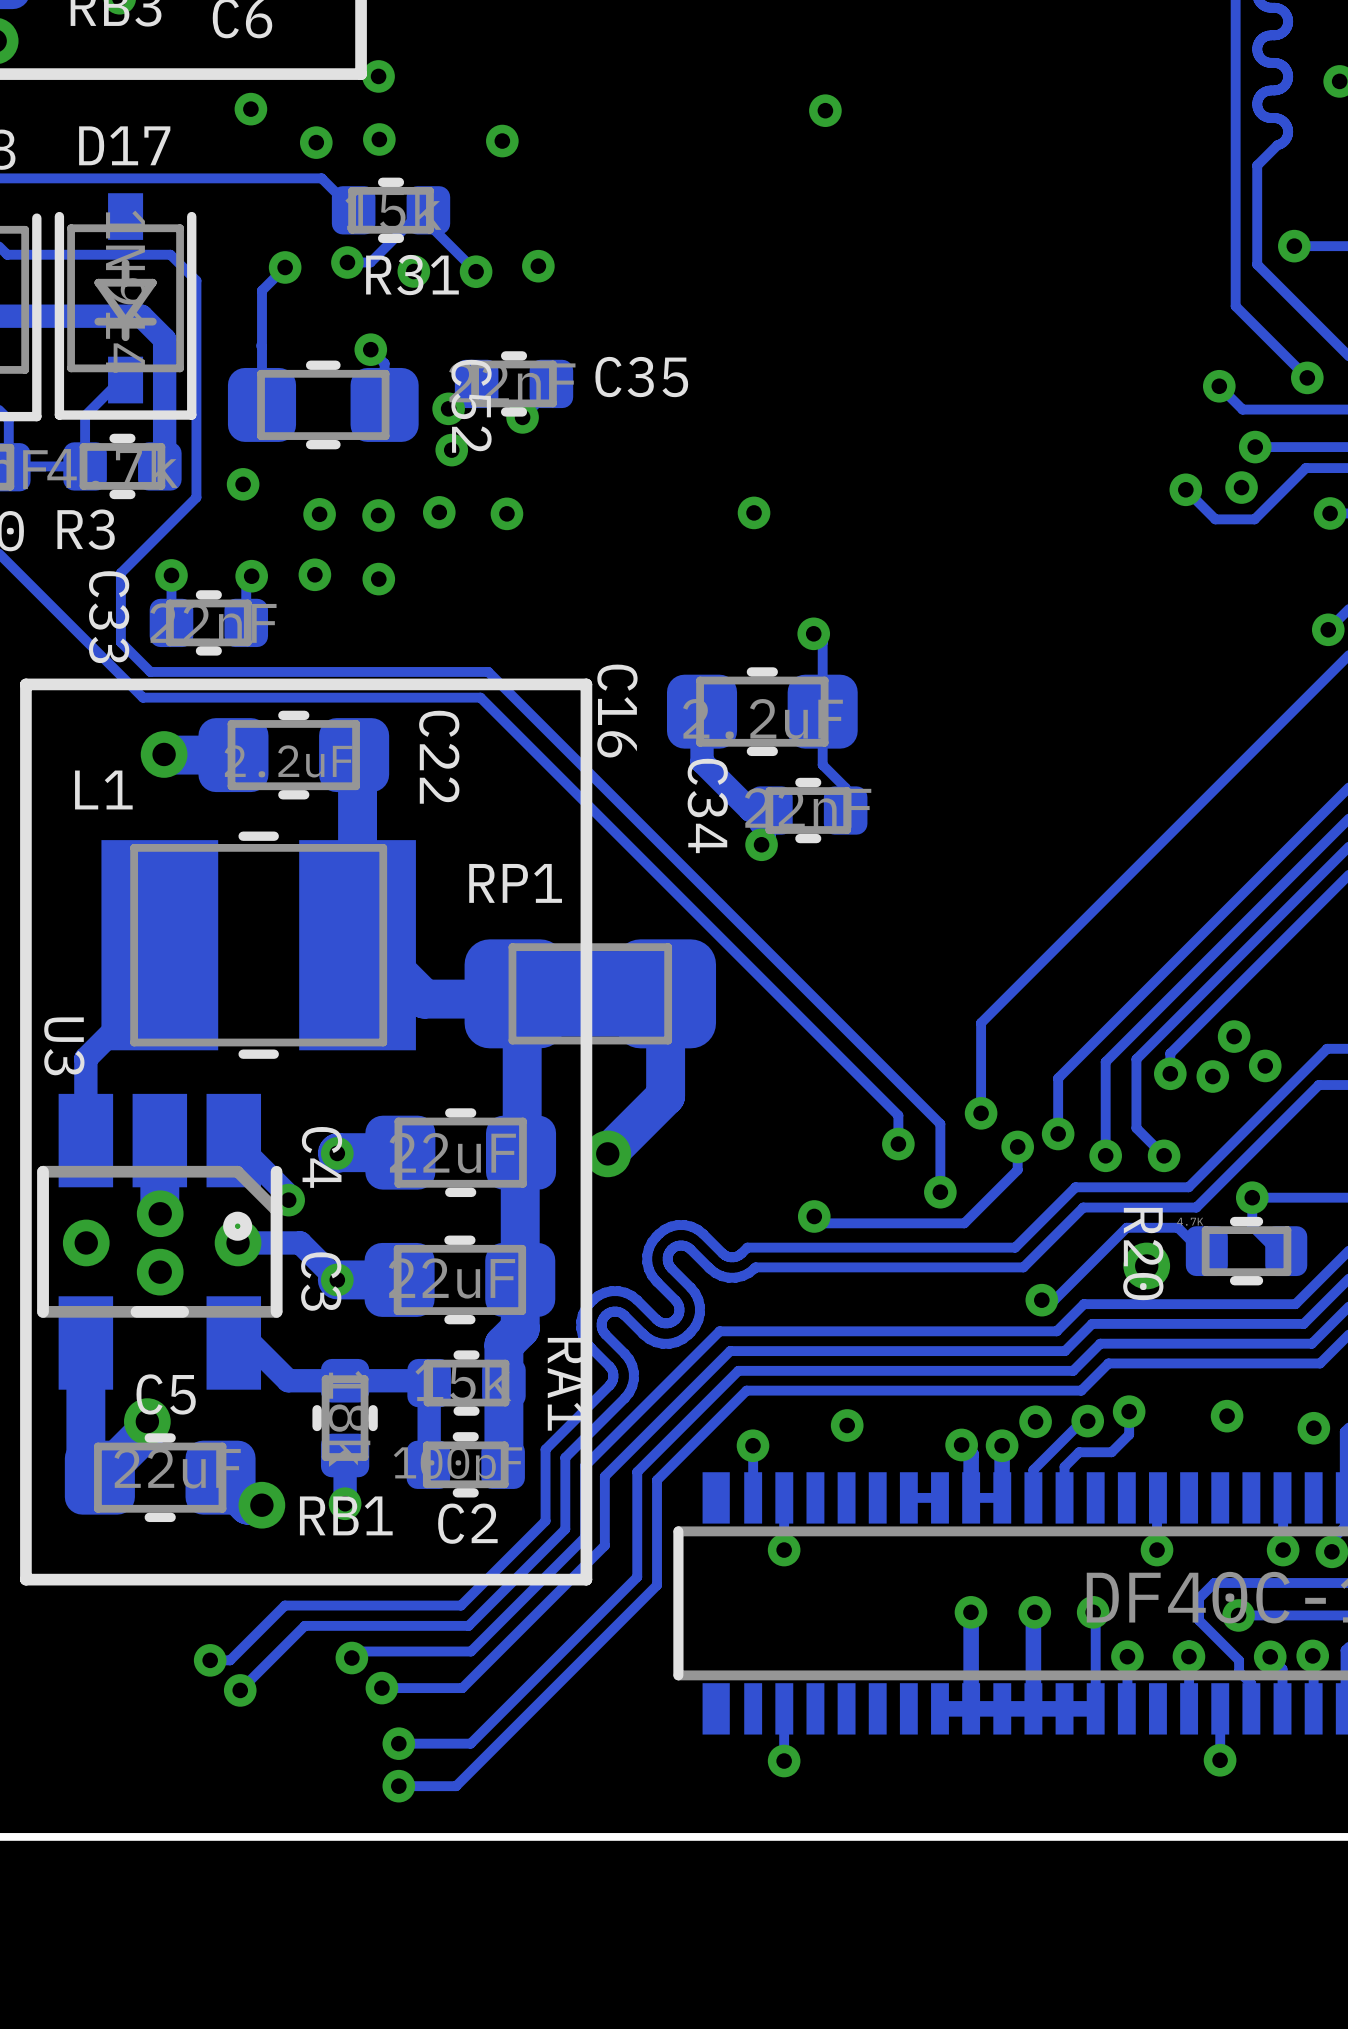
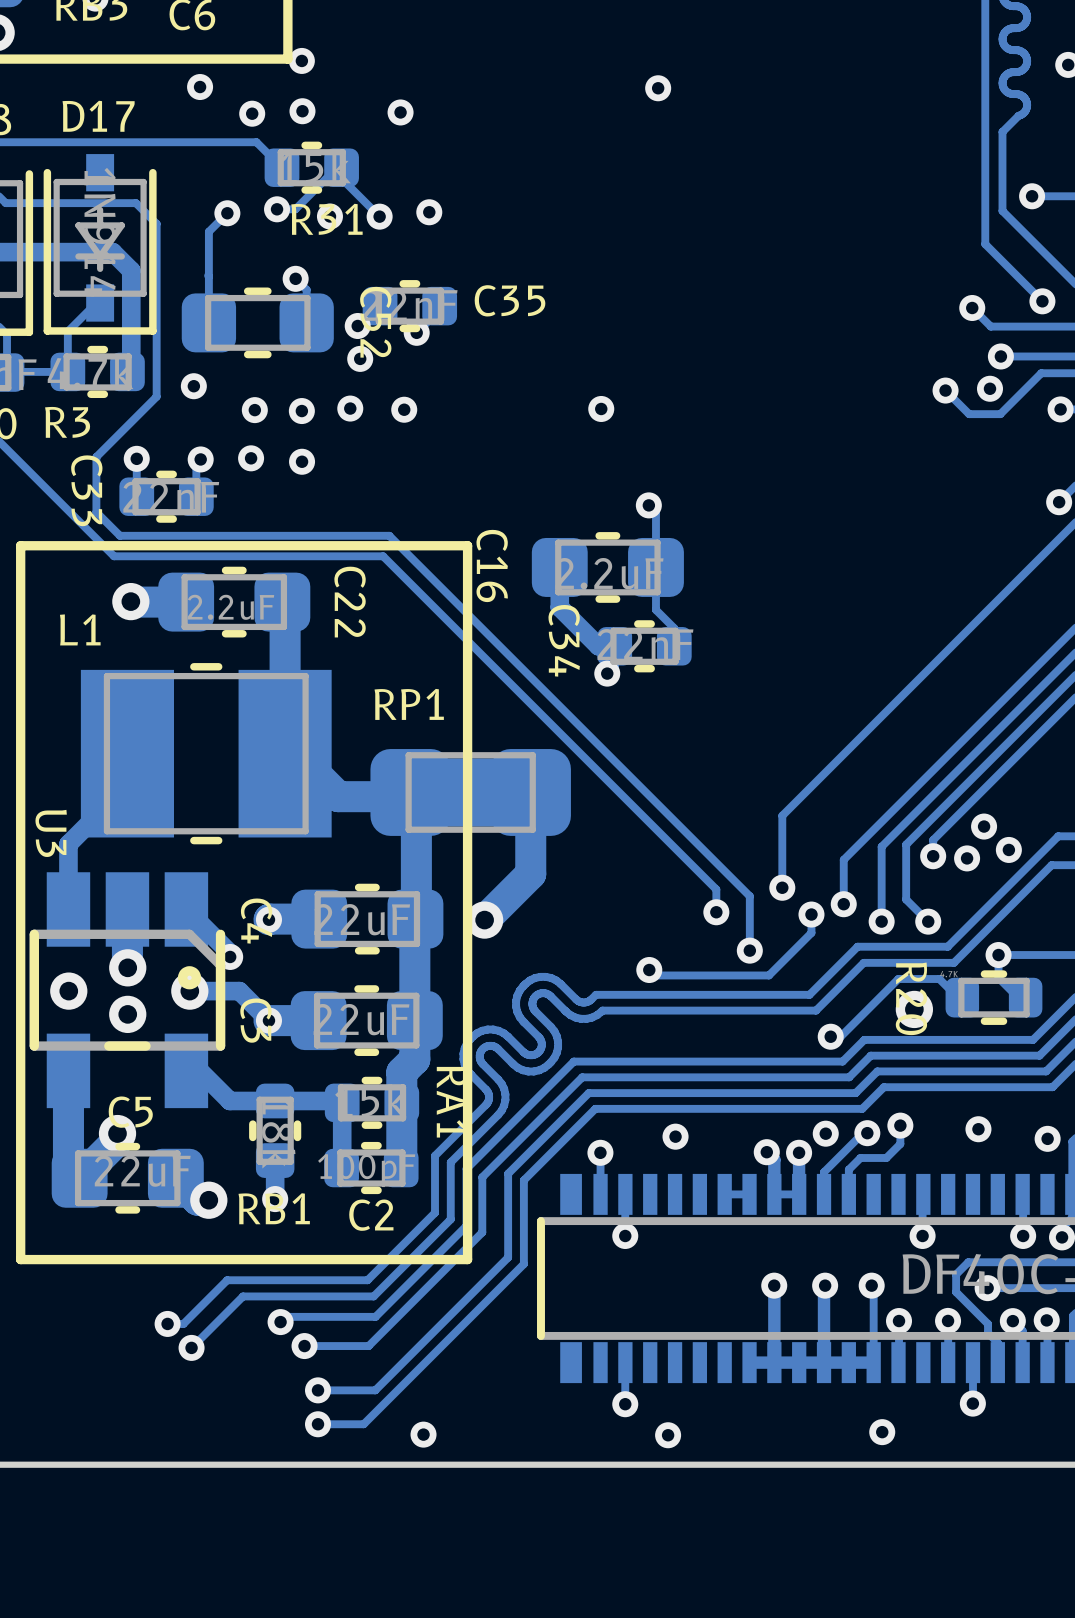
via: none -> (882, 1432)
via: none -> (423, 1434)
via: none -> (668, 1435)

